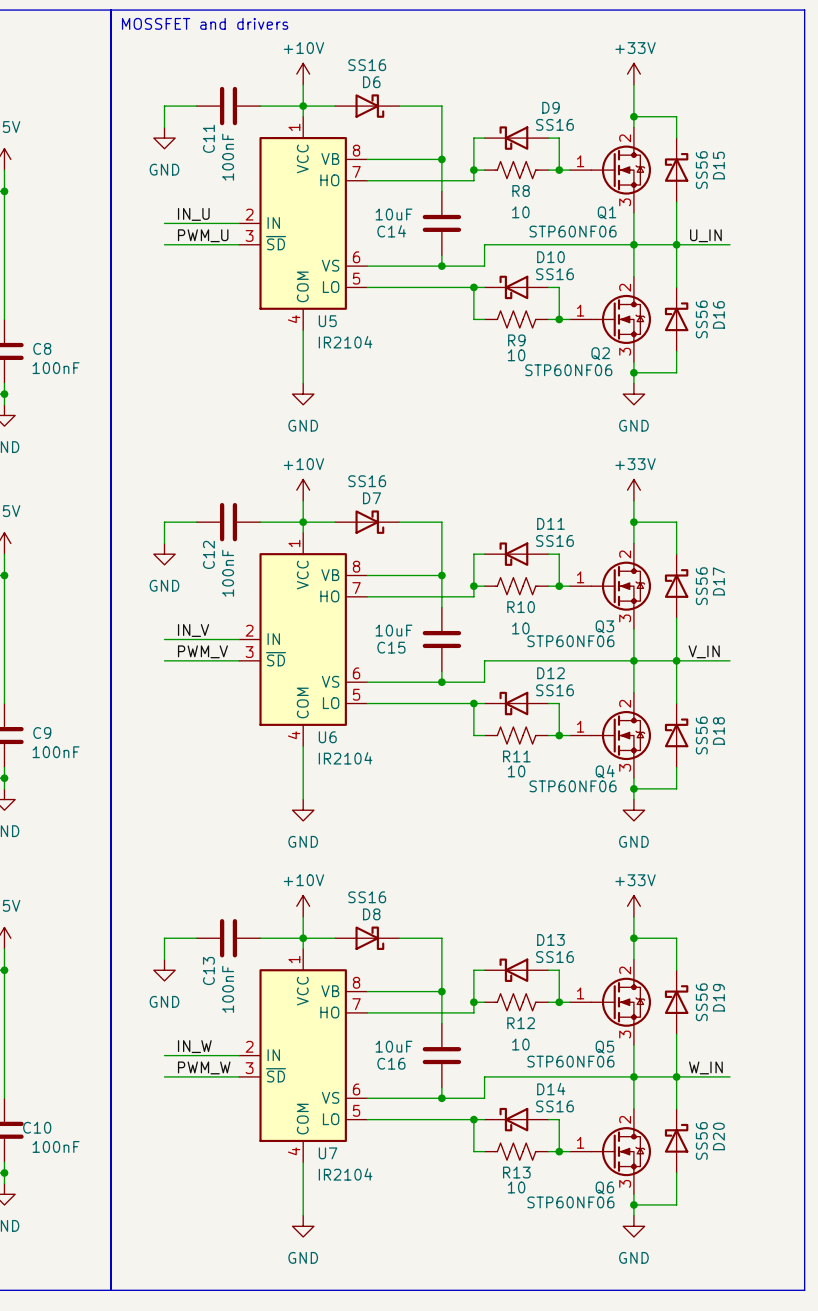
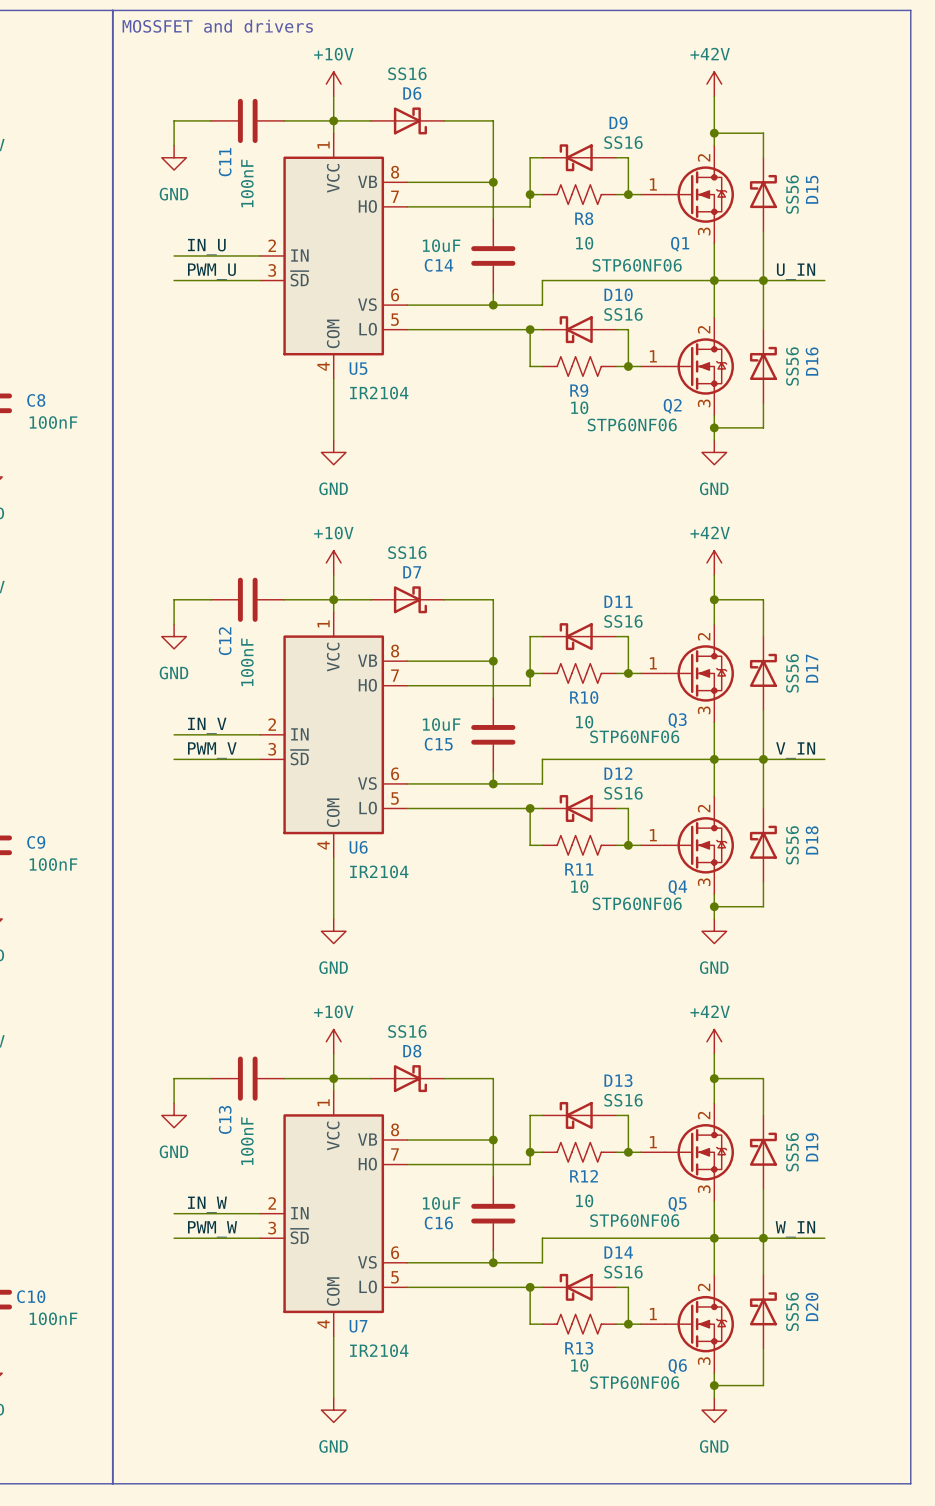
power symbol: +33V (633, 74) -> +42V (714, 84)
power symbol: +33V (633, 490) -> +42V (714, 562)
power symbol: +33V (633, 906) -> +42V (714, 1041)

